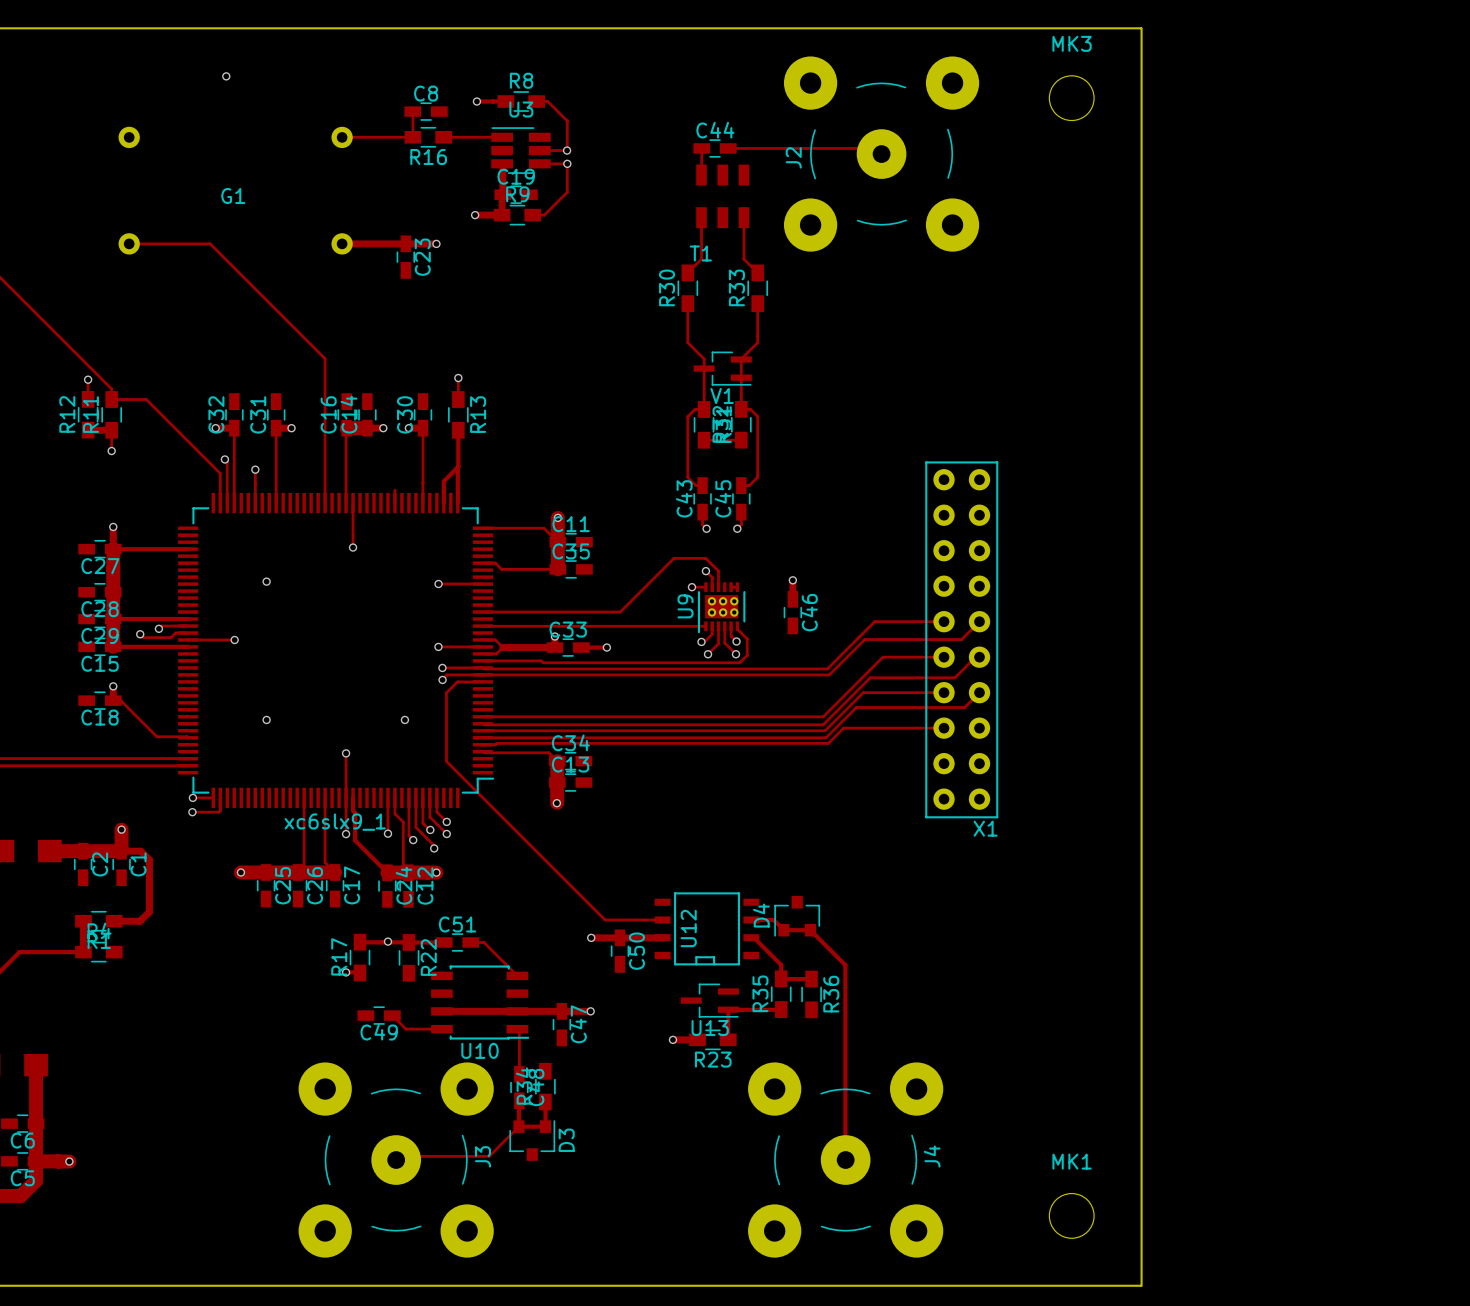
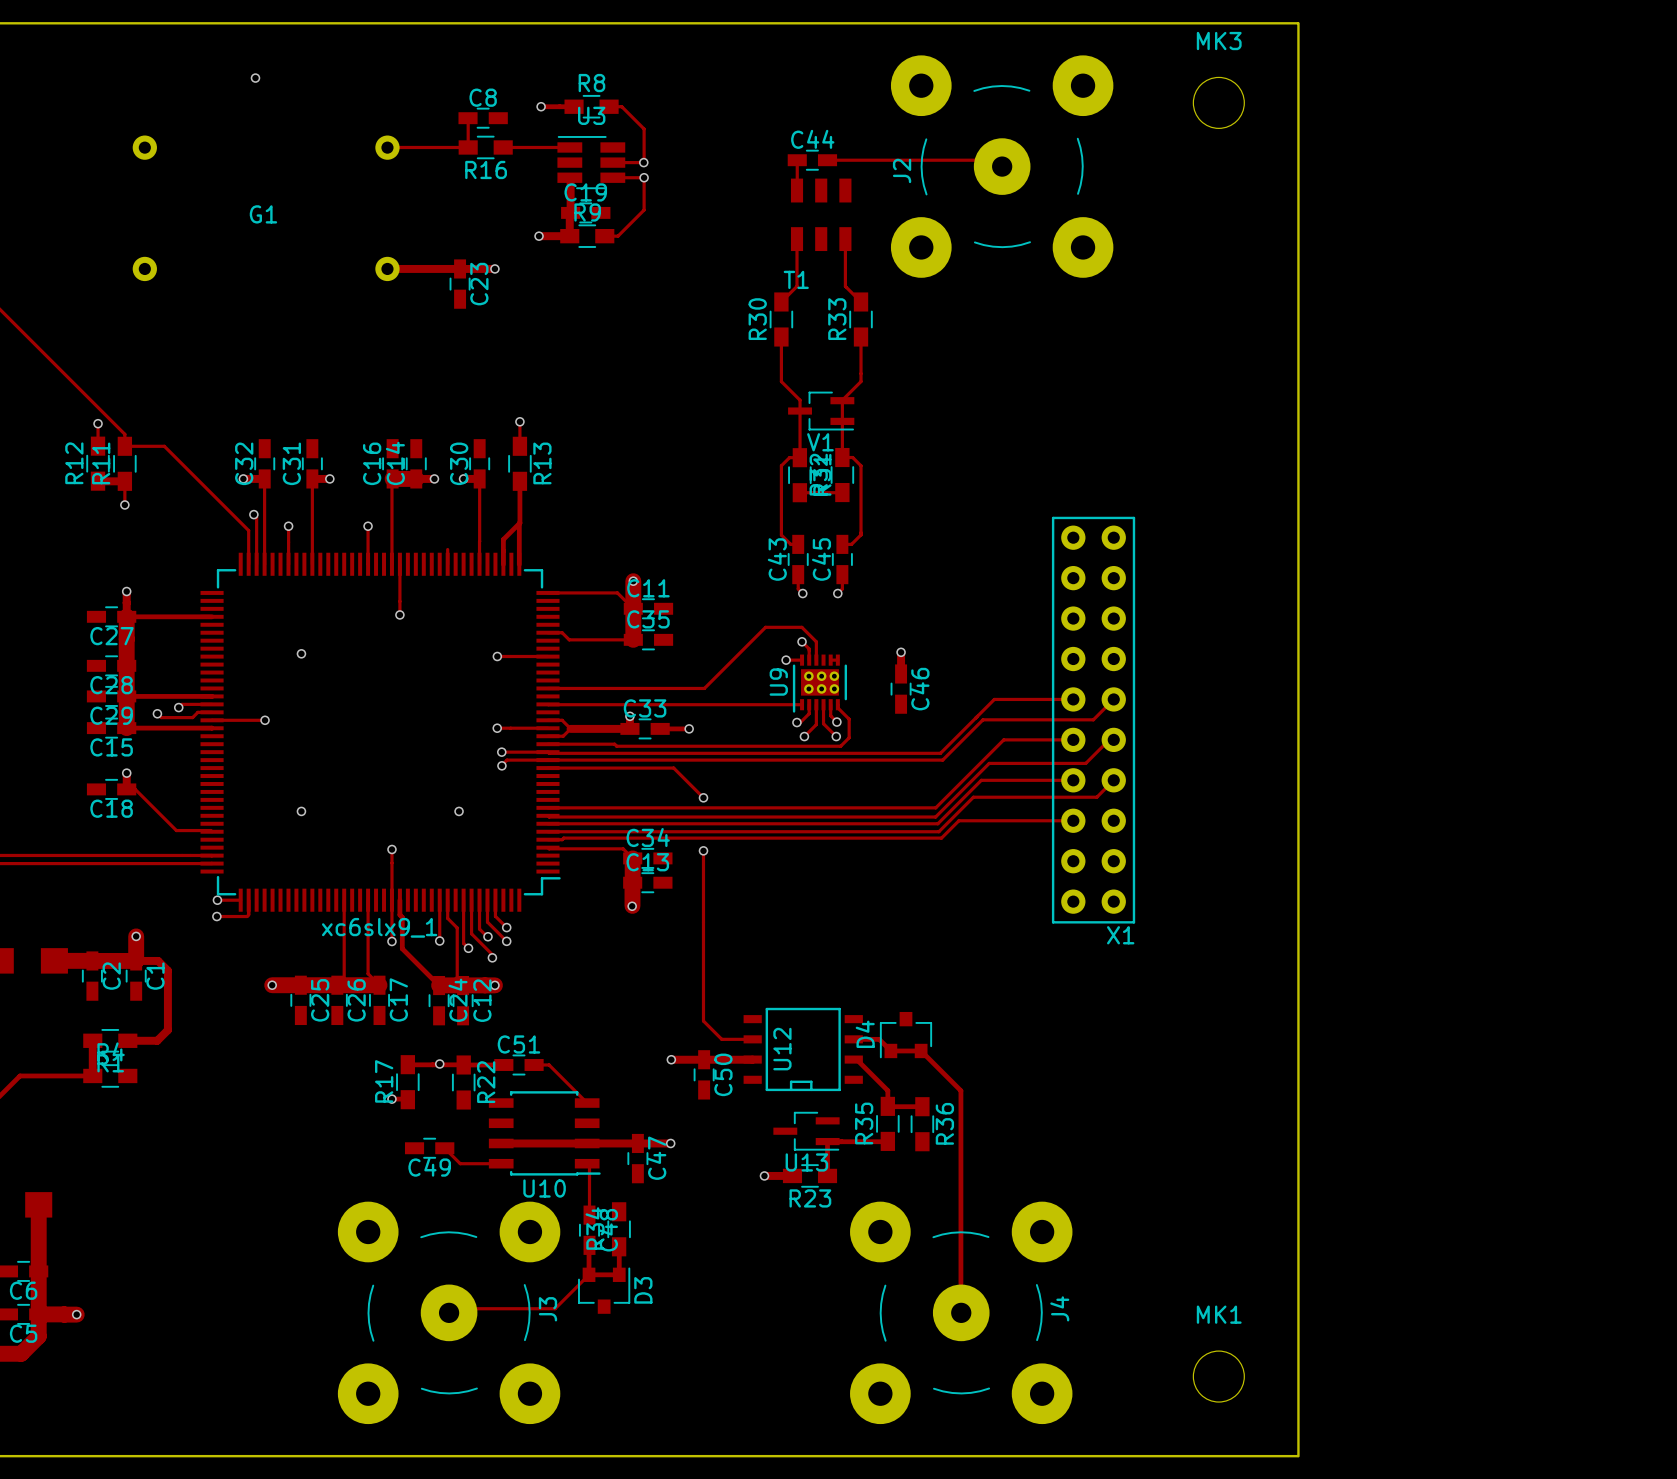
track: (129, 243) (210, 243) (325, 358) (325, 469) -> none
via: none -> (368, 526)
track: (482, 681) (457, 681) (446, 692) (446, 761) (605, 919) (635, 919) -> (703, 850) (703, 1021) (721, 1039)
track: none -> (547, 768) (673, 768) (703, 797)
via: none -> (703, 797)
via: none -> (703, 850)

